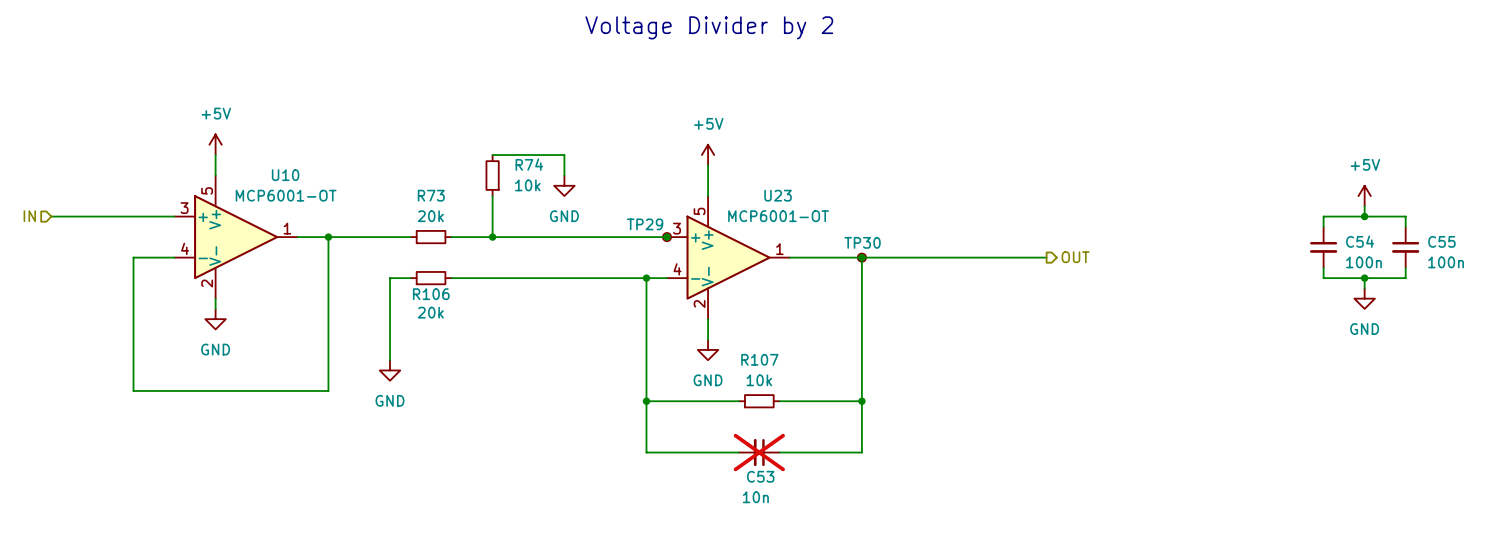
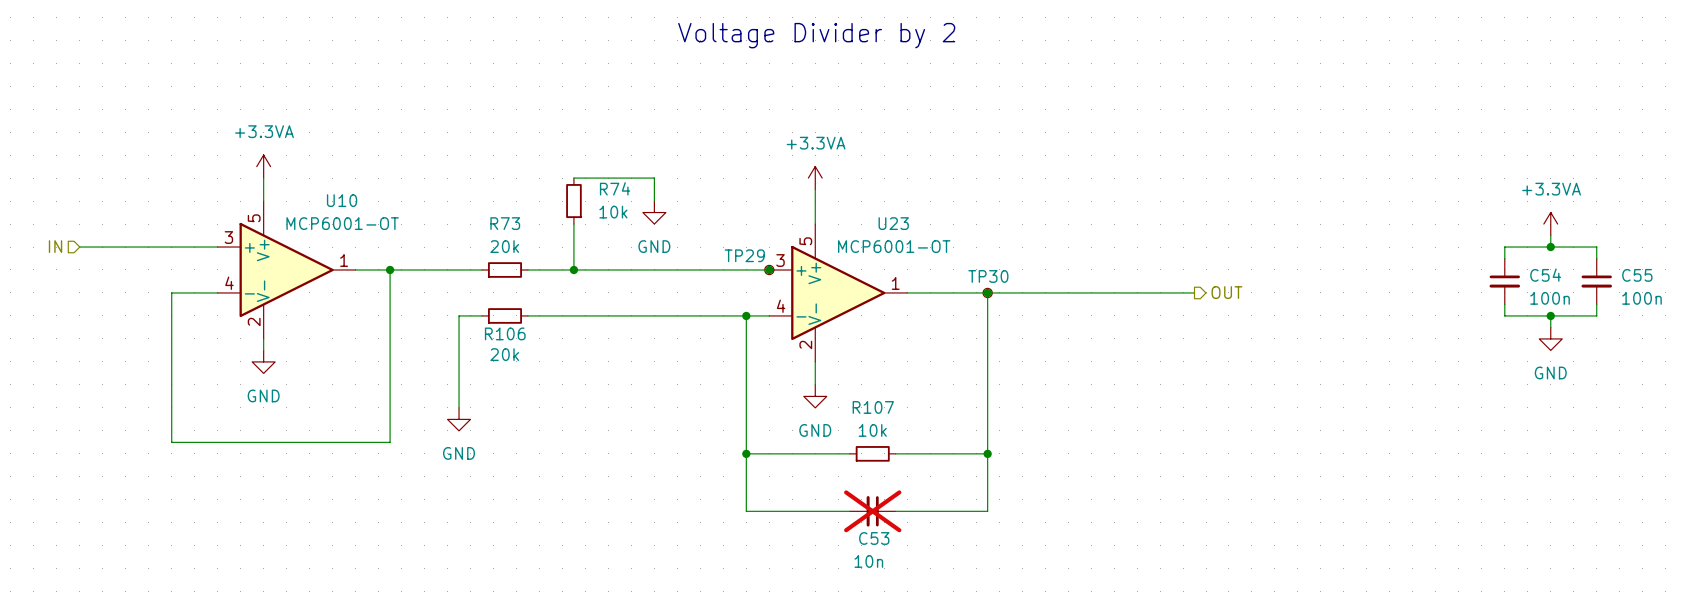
power symbol: +5V (215, 144) -> +3.3VA (263, 166)
power symbol: +5V (708, 155) -> +3.3VA (815, 178)
power symbol: +5V (1364, 196) -> +3.3VA (1550, 224)

